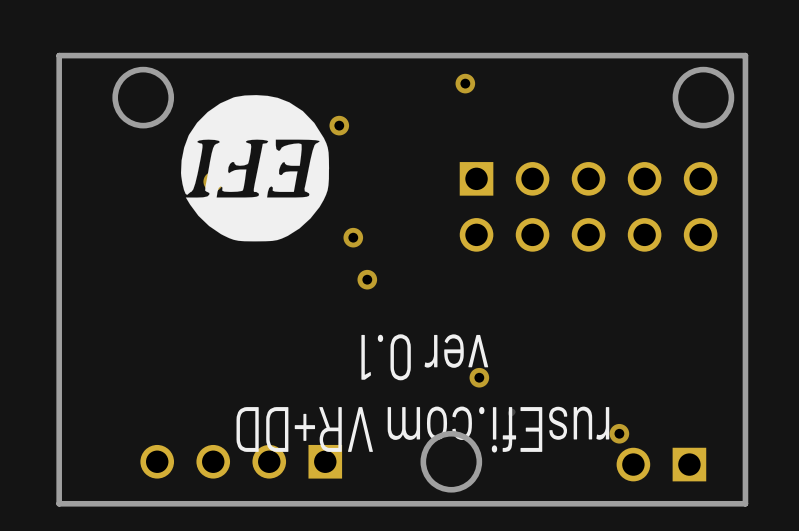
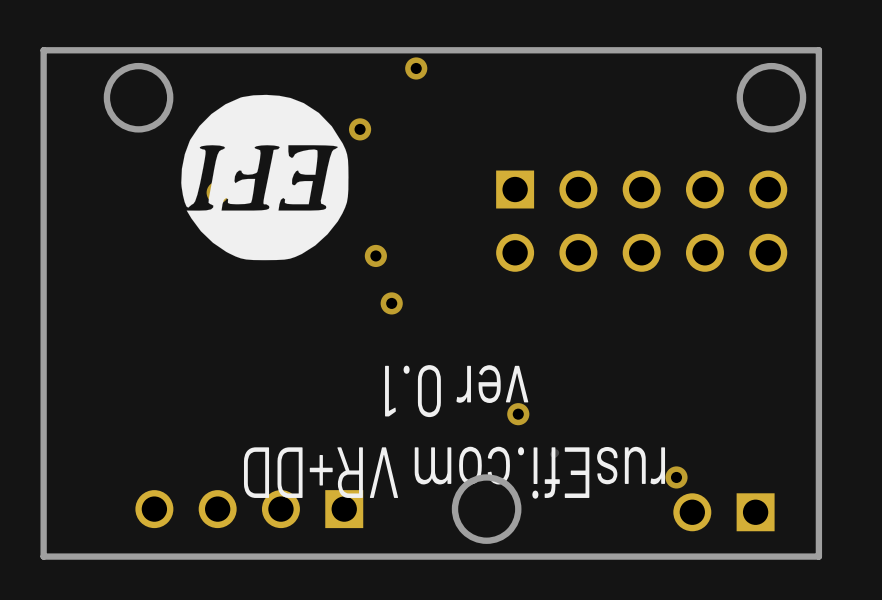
via position: (465, 83) -> (416, 68)

